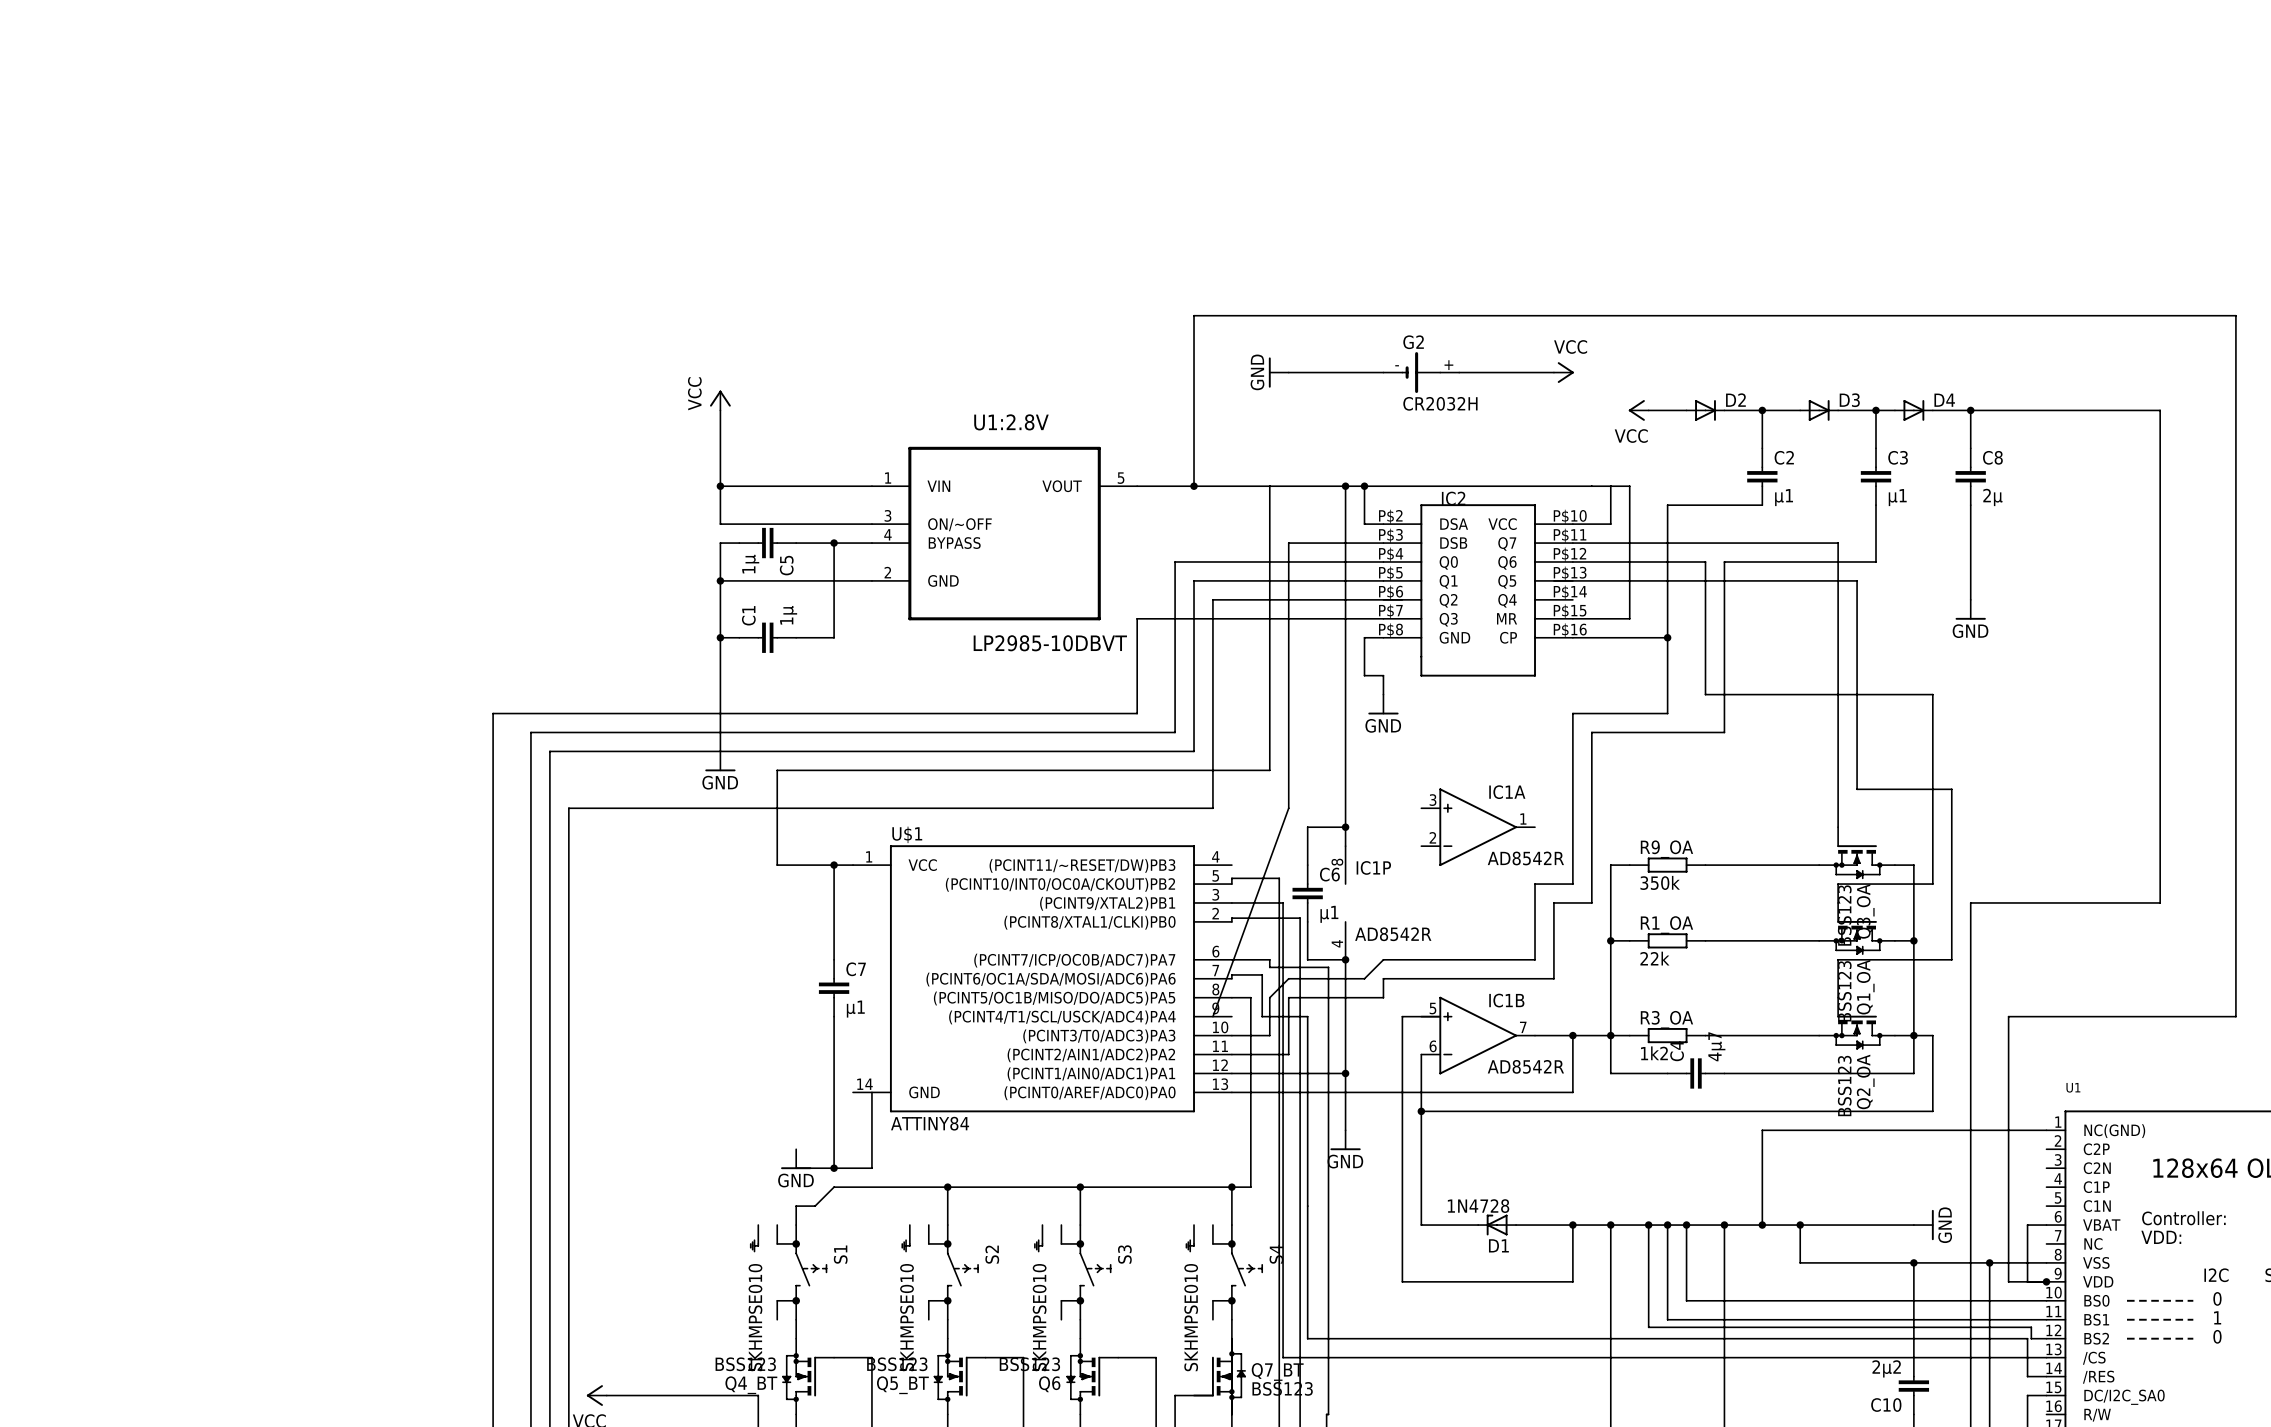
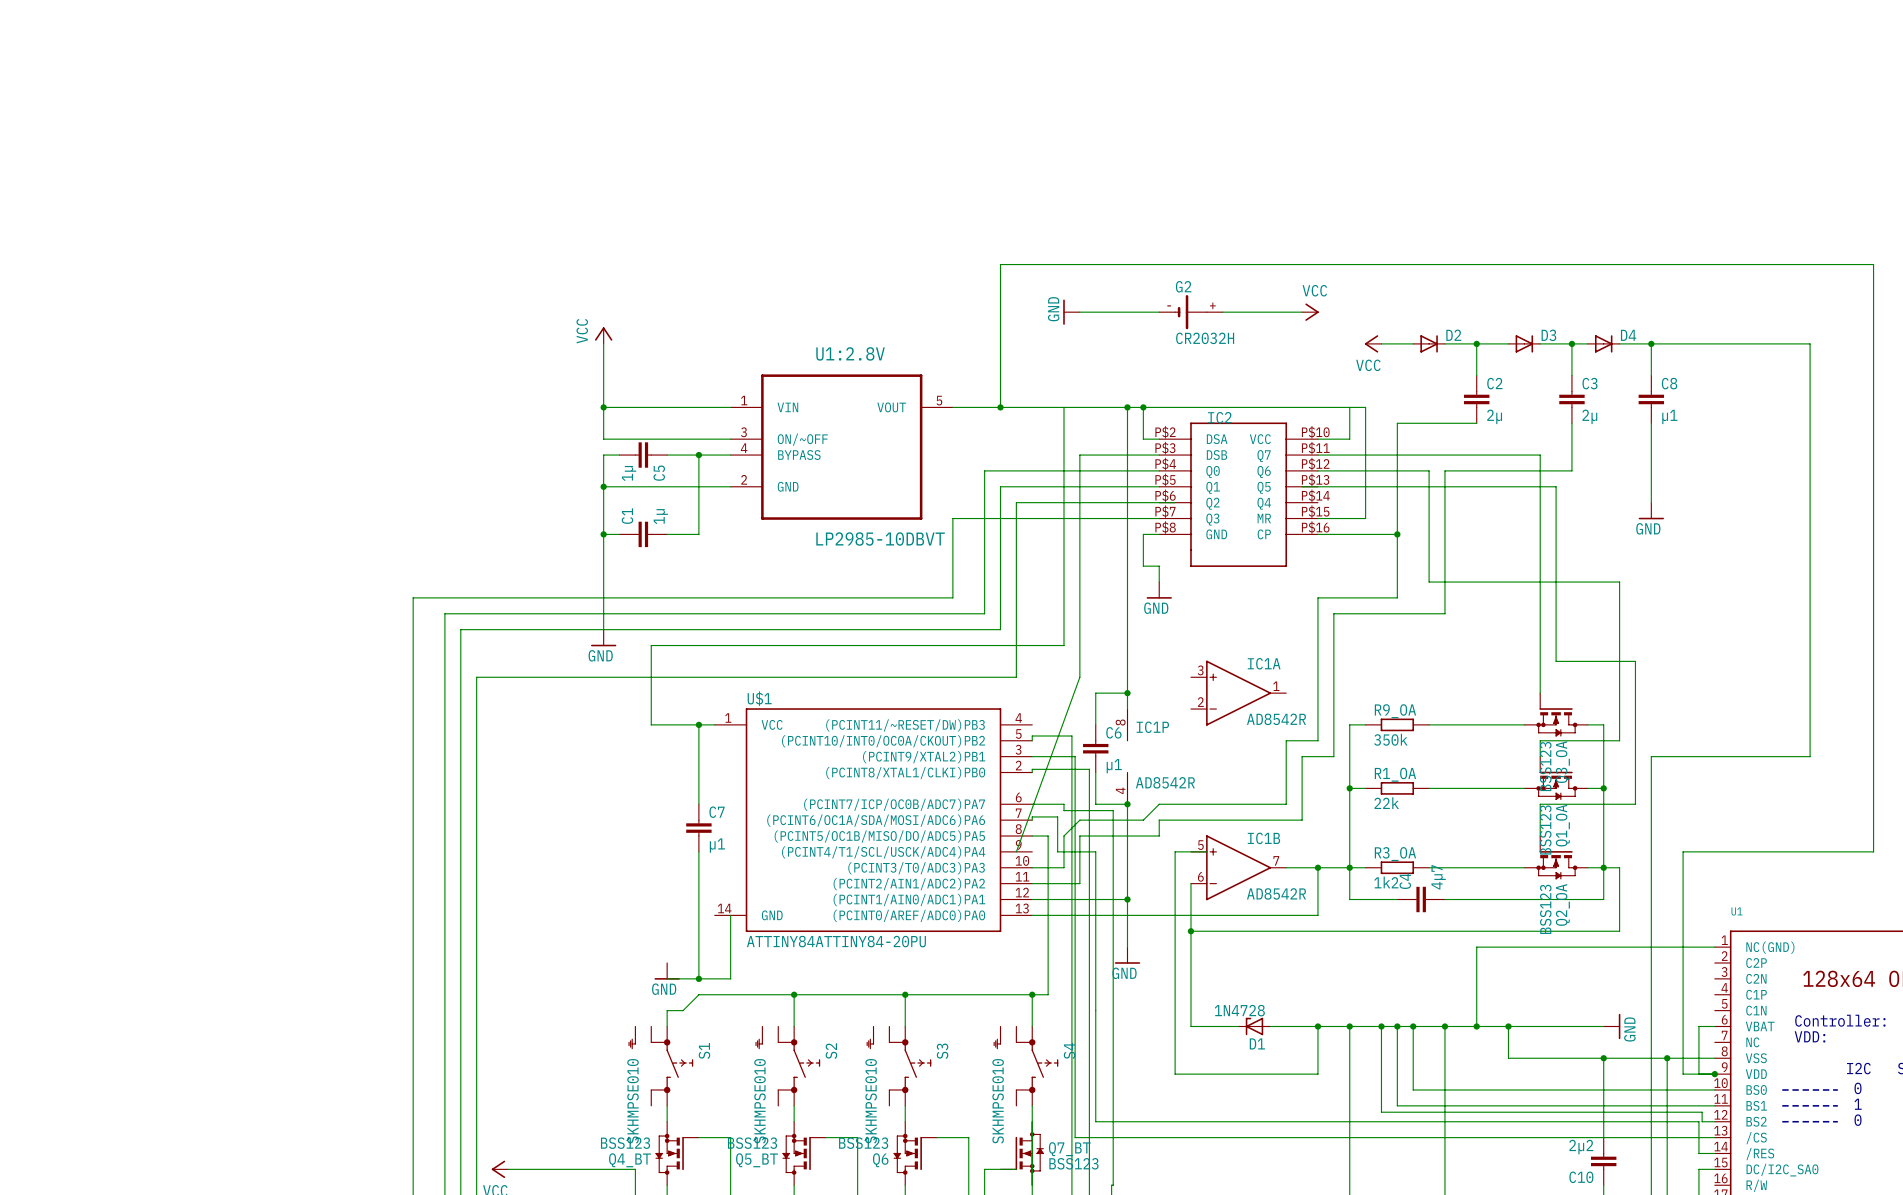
C2 value: µ1 (1784, 497) -> 2µ (1494, 416)
C3 value: µ1 (1897, 497) -> 2µ (1589, 416)
C8 value: 2µ (1992, 497) -> µ1 (1669, 416)
U$1 value: ATTINY84 (930, 1123) -> ATTINY84ATTINY84-20PU (836, 941)

